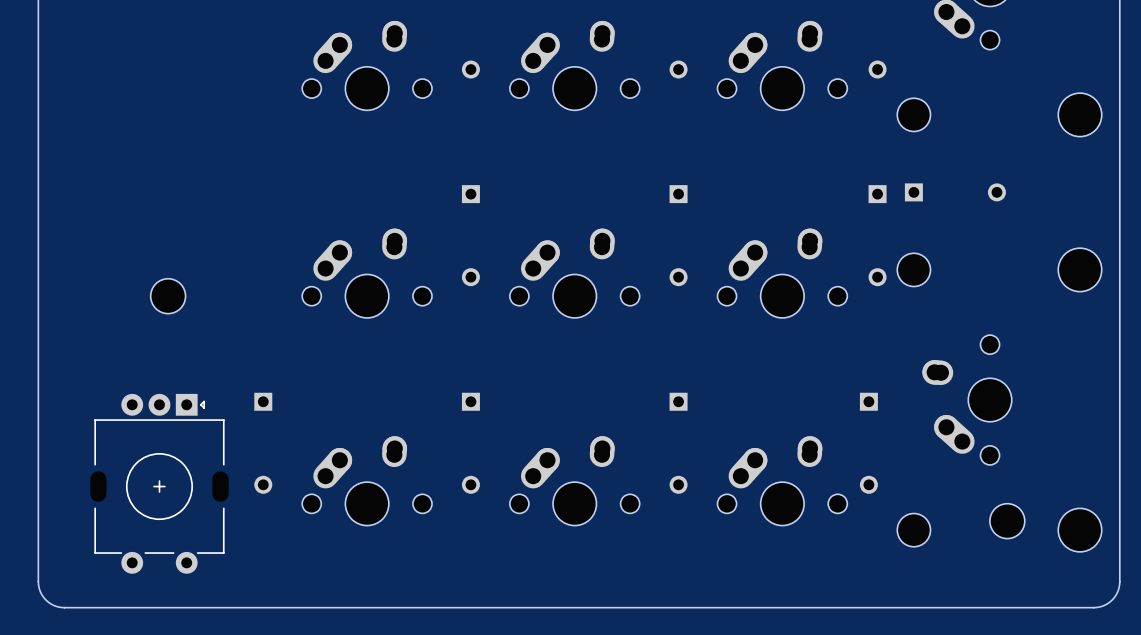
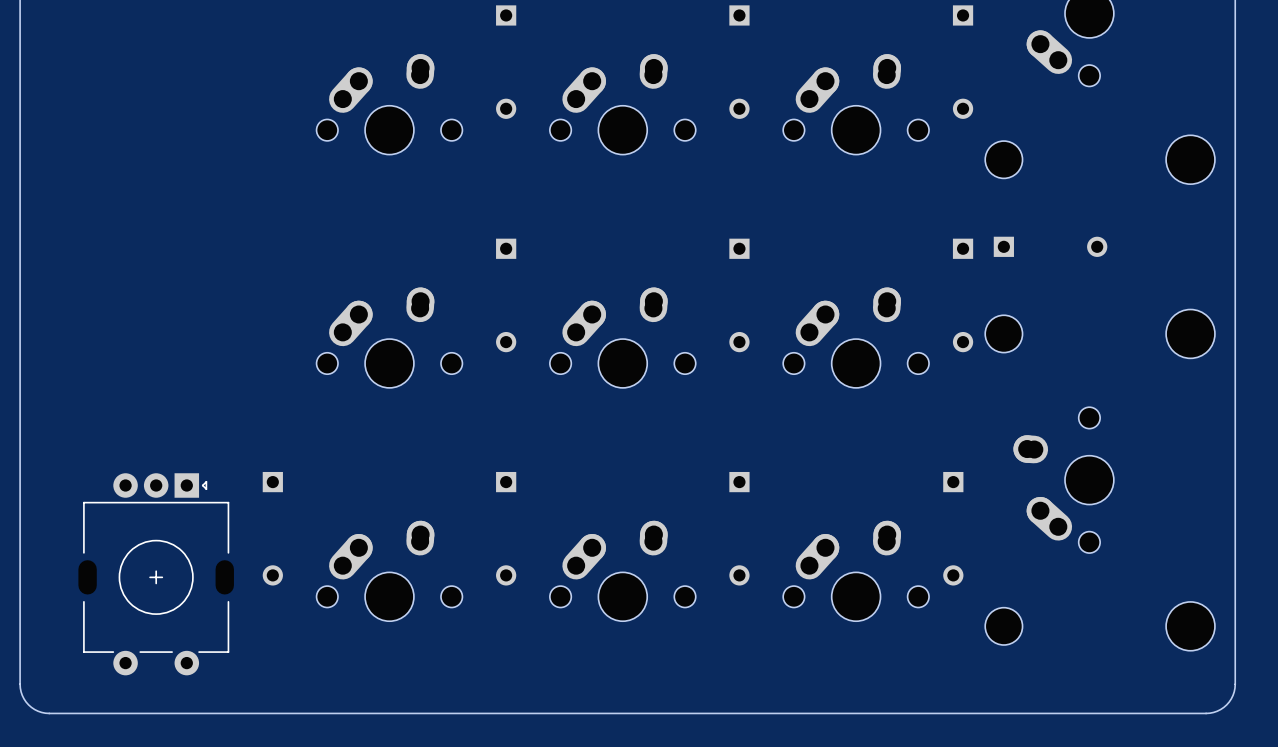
part: (168, 296) -> none
part: (1007, 521) -> none

